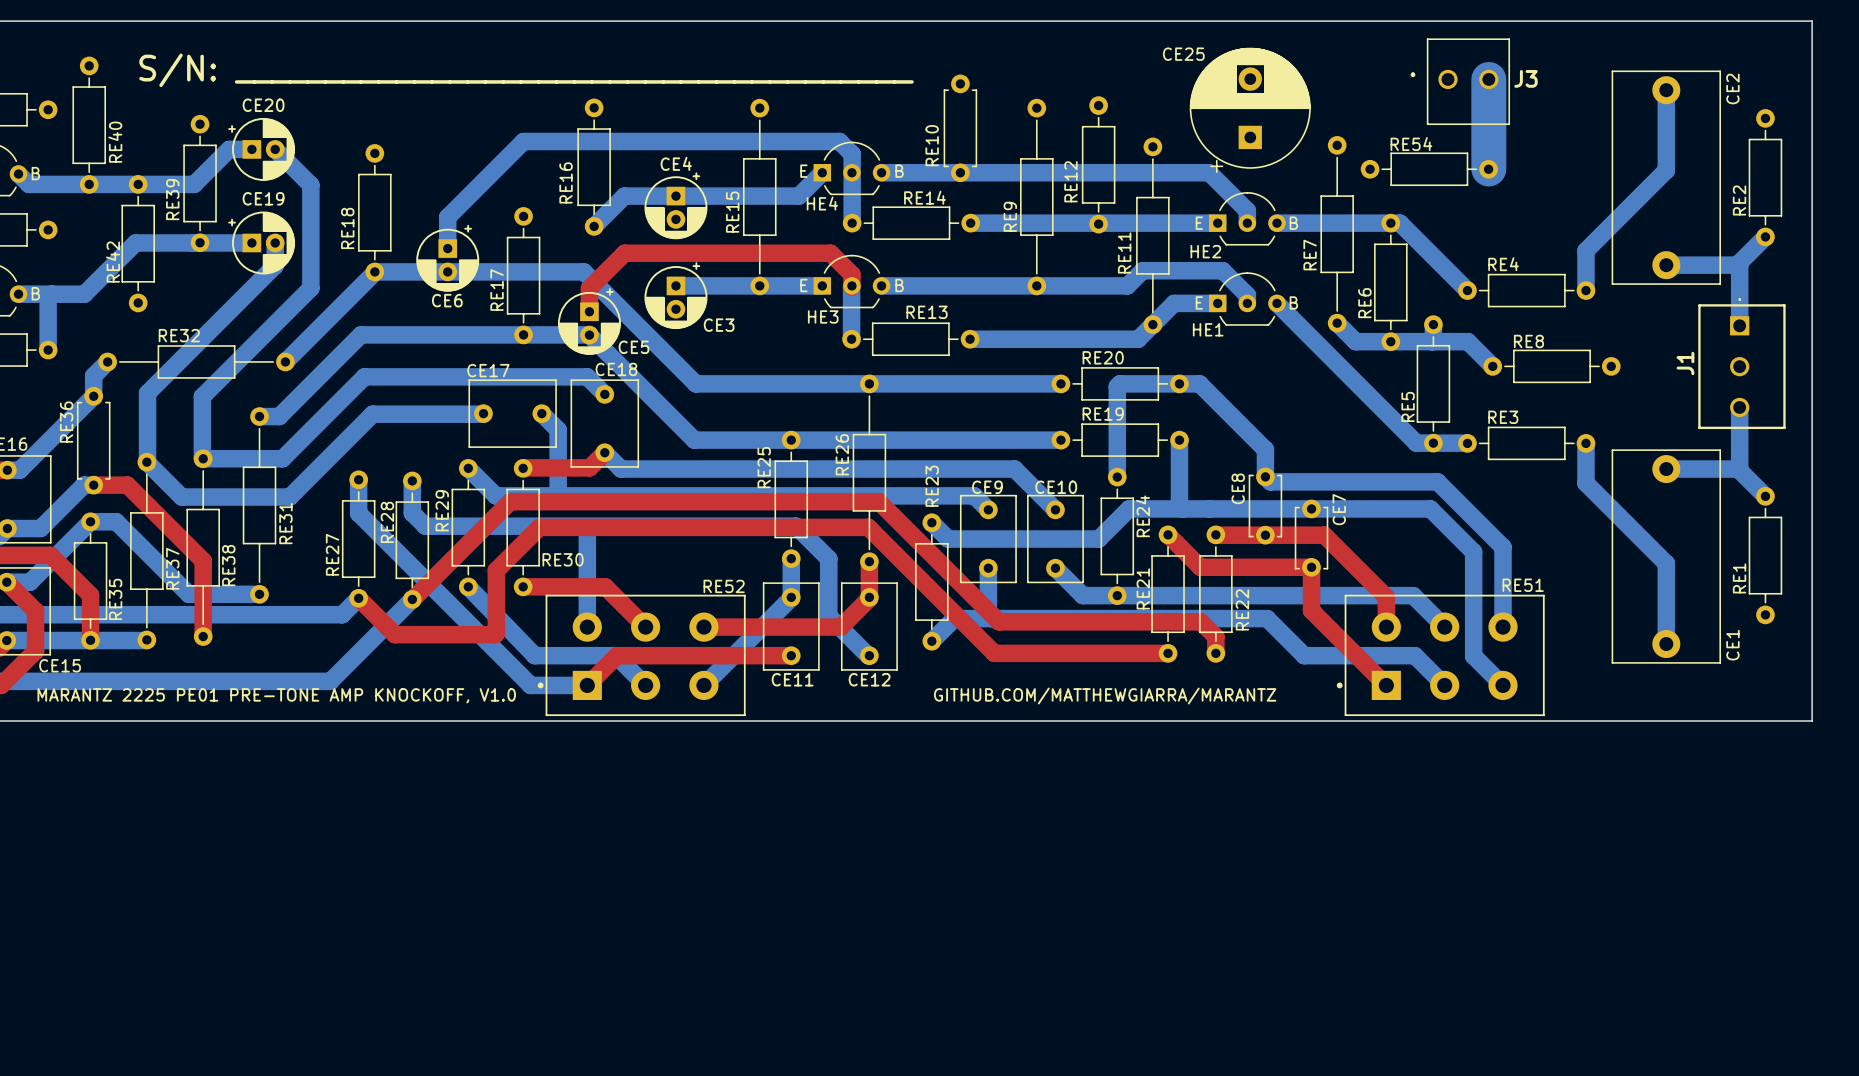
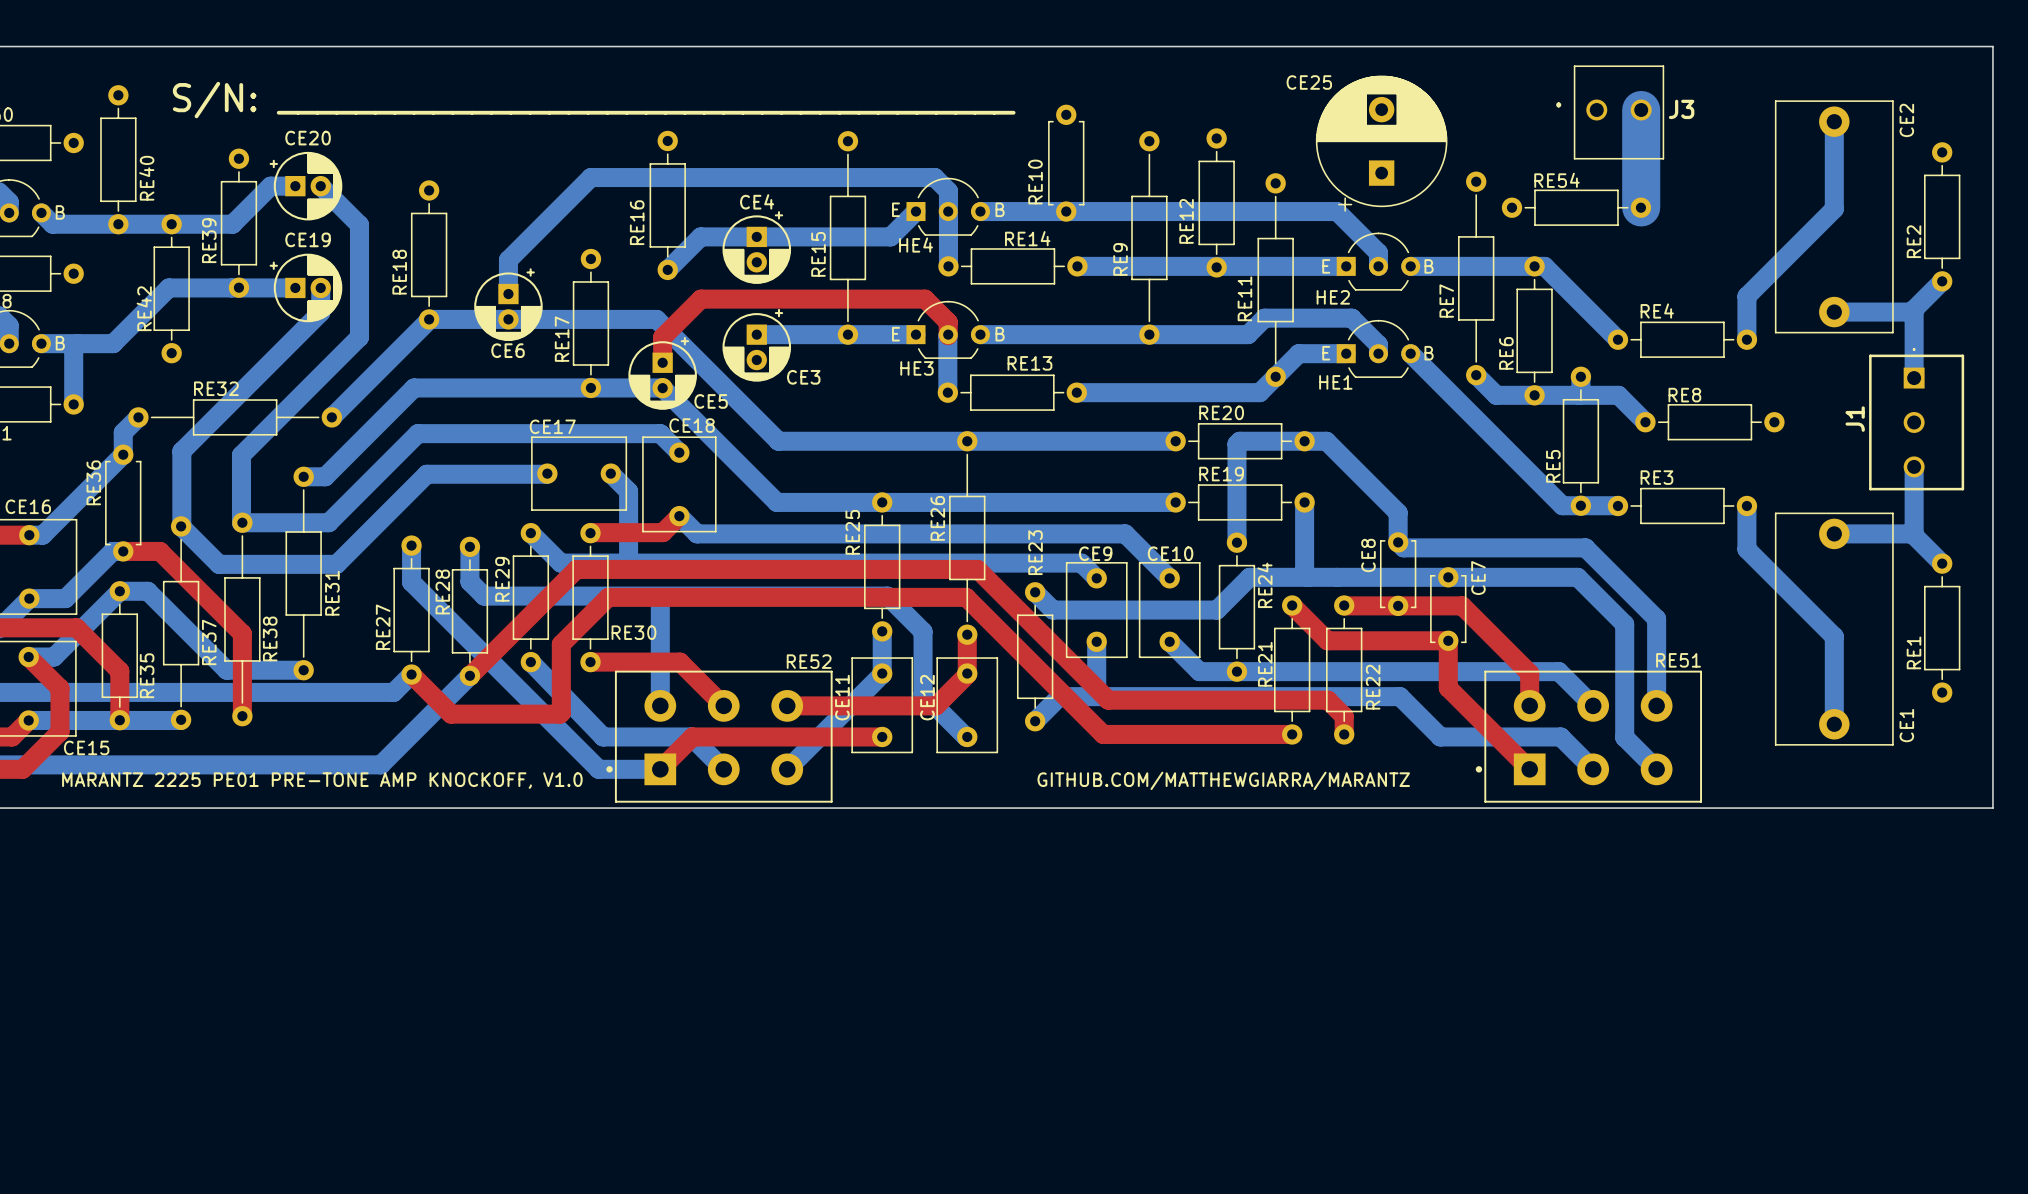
CE11 name rotation: 0° (792, 679) -> 90° counterclockwise (842, 697)
CE11 name position: CE11 (792, 679) -> CE11 (842, 697)
CE12 name rotation: 0° (869, 679) -> 90° counterclockwise (927, 697)
CE12 name position: CE12 (869, 679) -> CE12 (927, 697)

